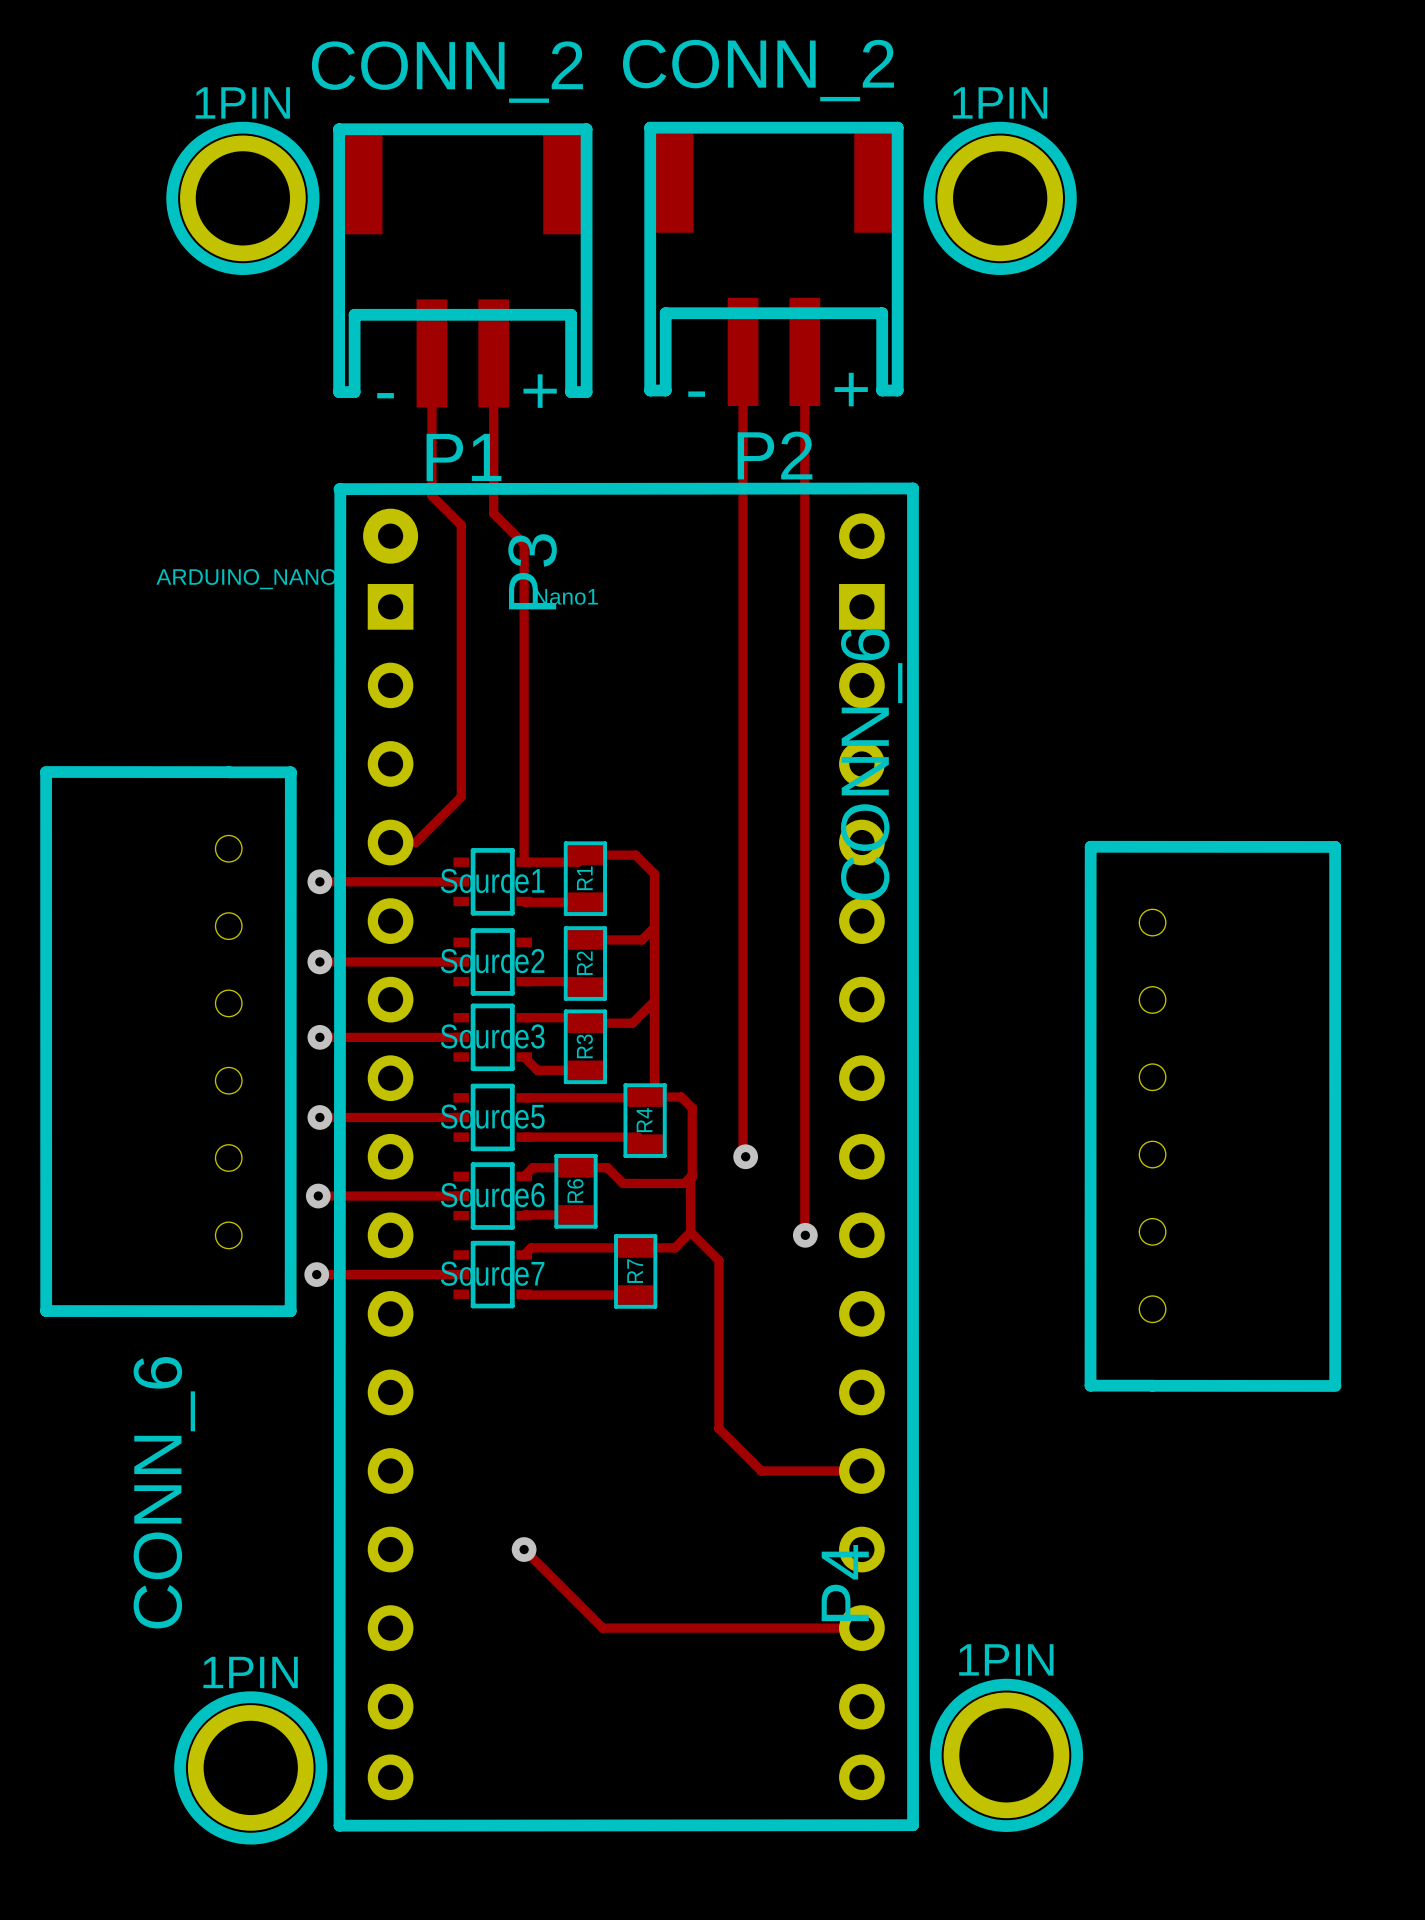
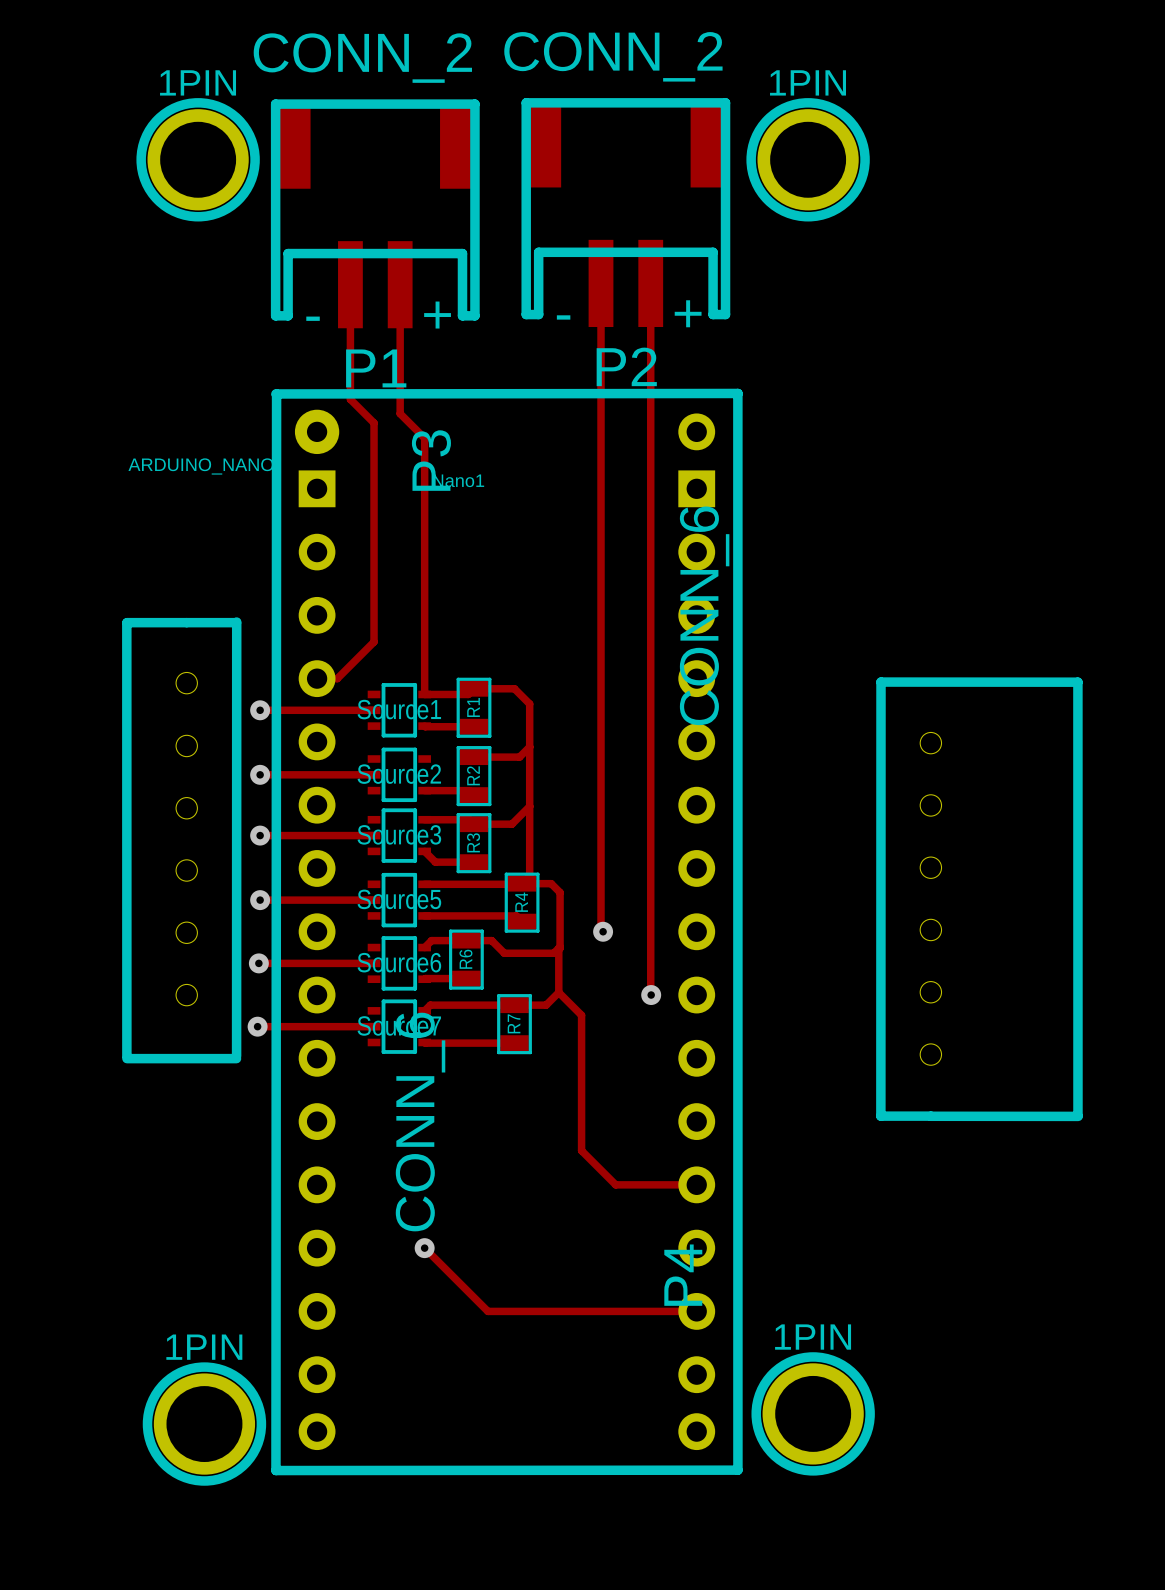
P3 footprint: [39, 766, 297, 1318] -> [122, 617, 242, 1064]
P3 value position: CONN_6 (164, 1492) -> CONN_6 (420, 1122)

